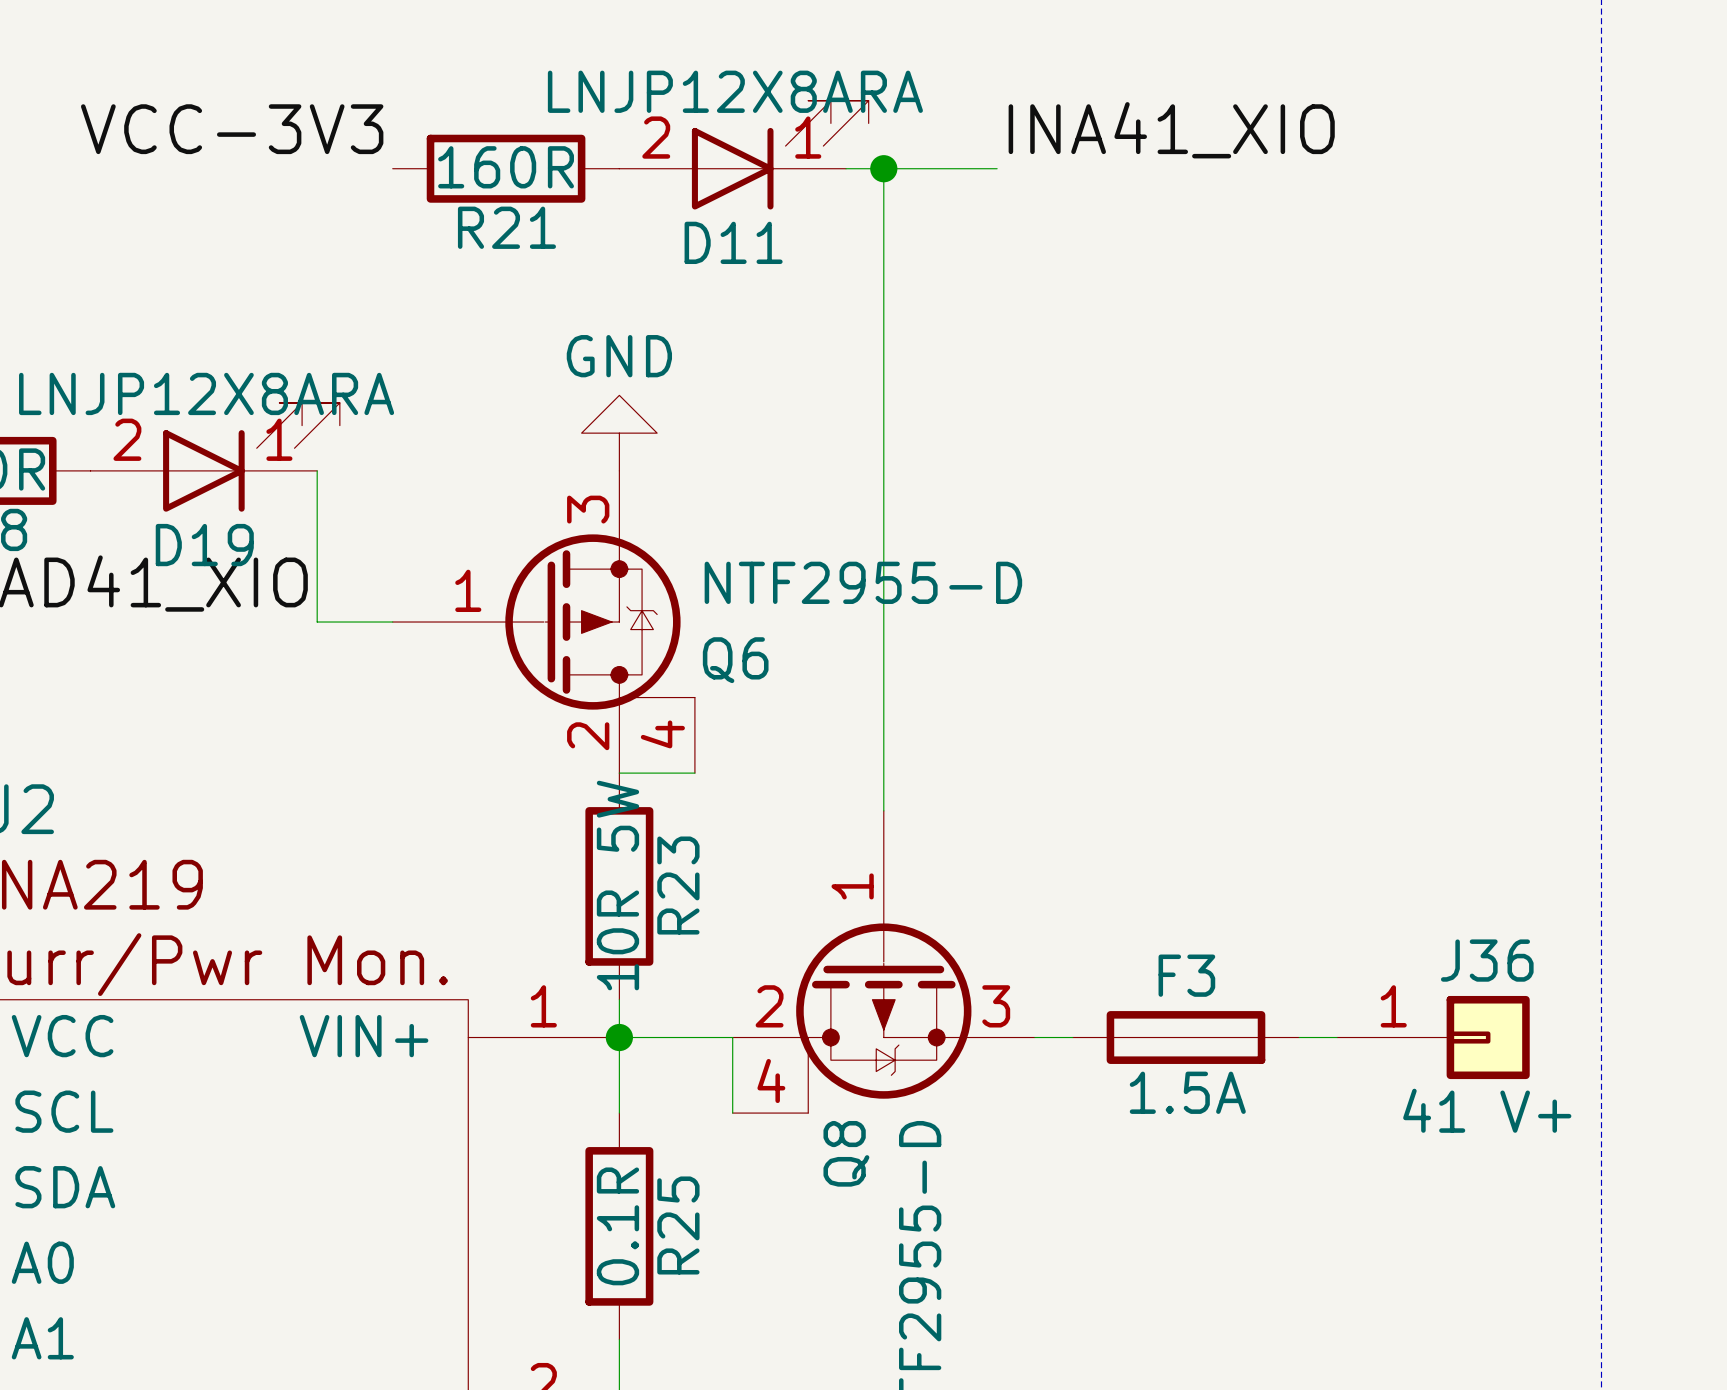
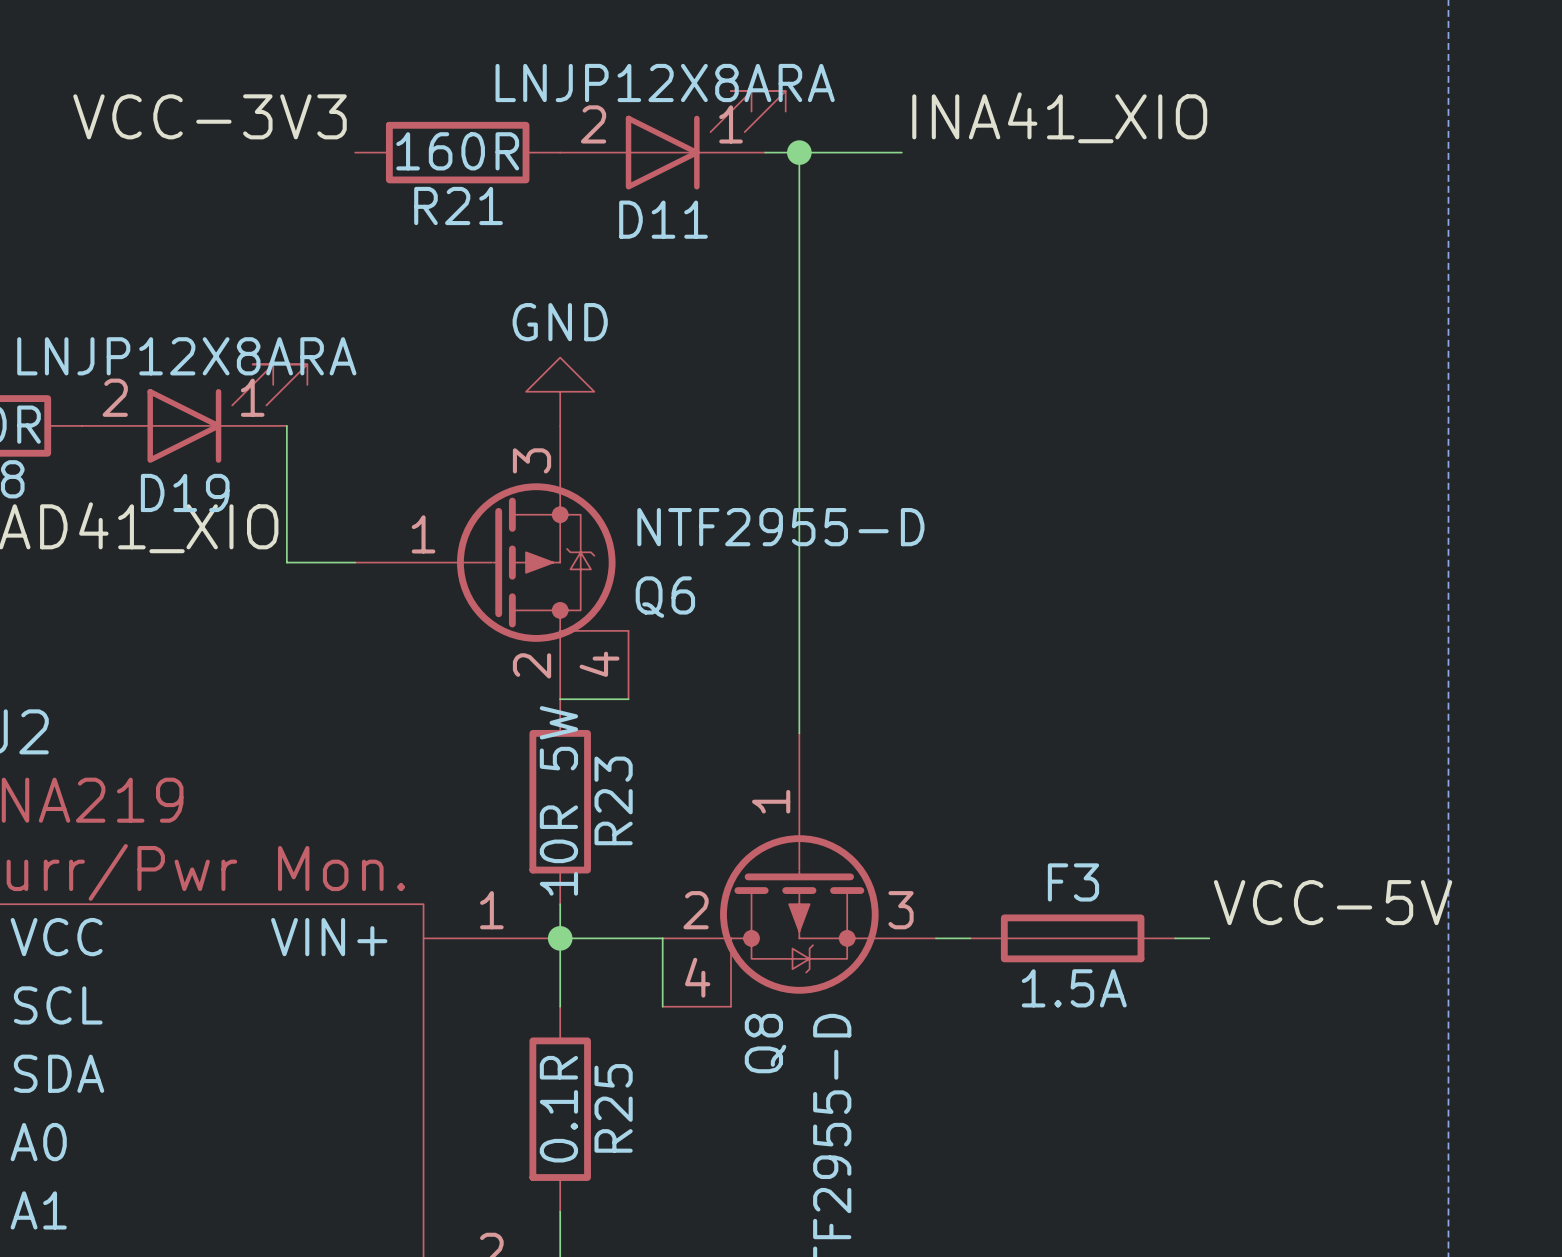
label: none -> VCC-5V (1333, 902)
J36: 41 V+ (1433, 1037) -> none

